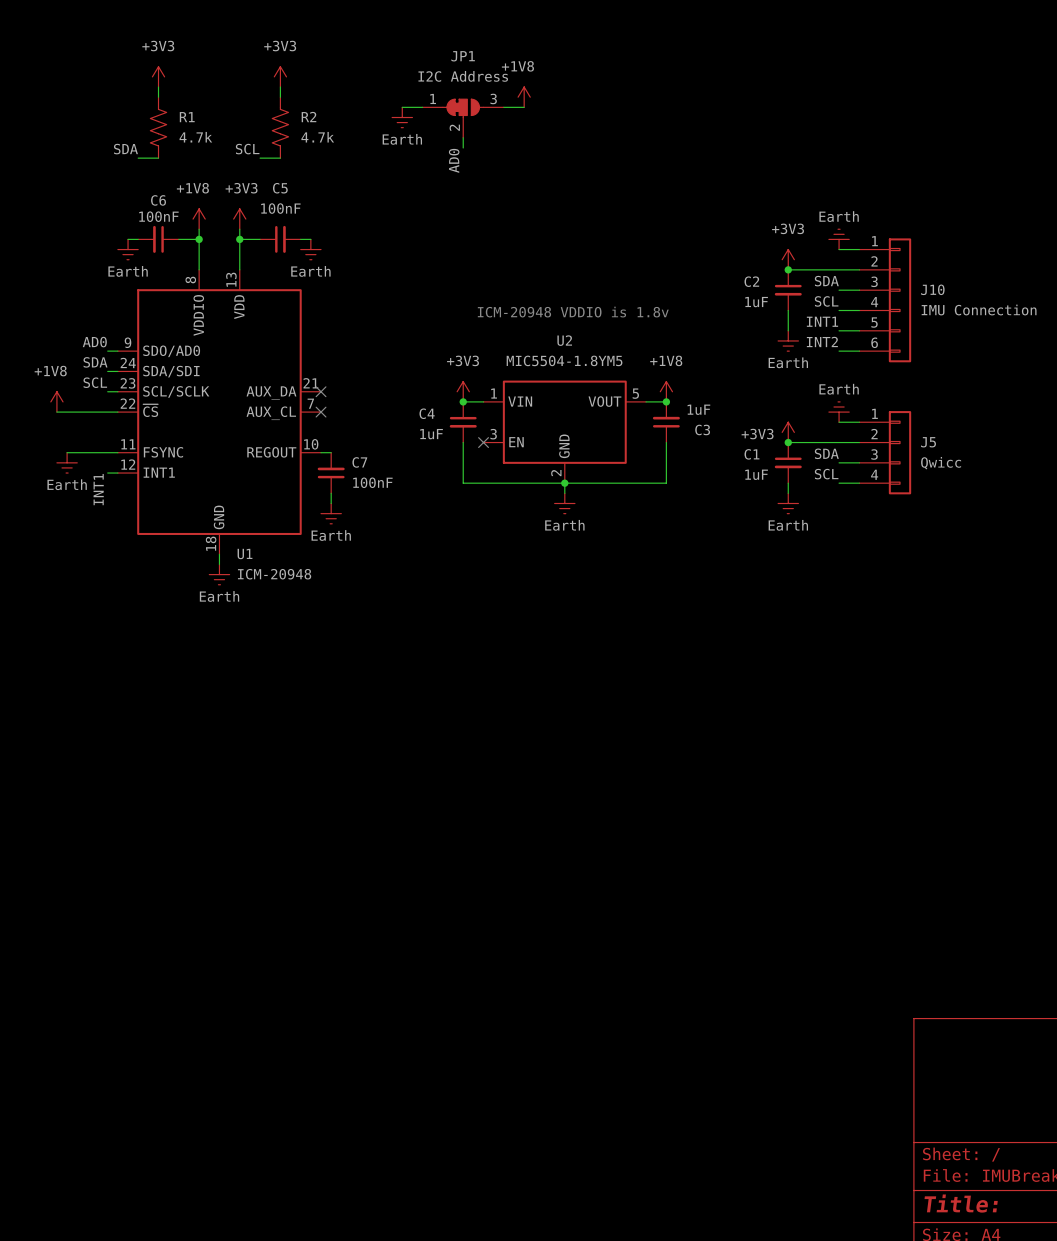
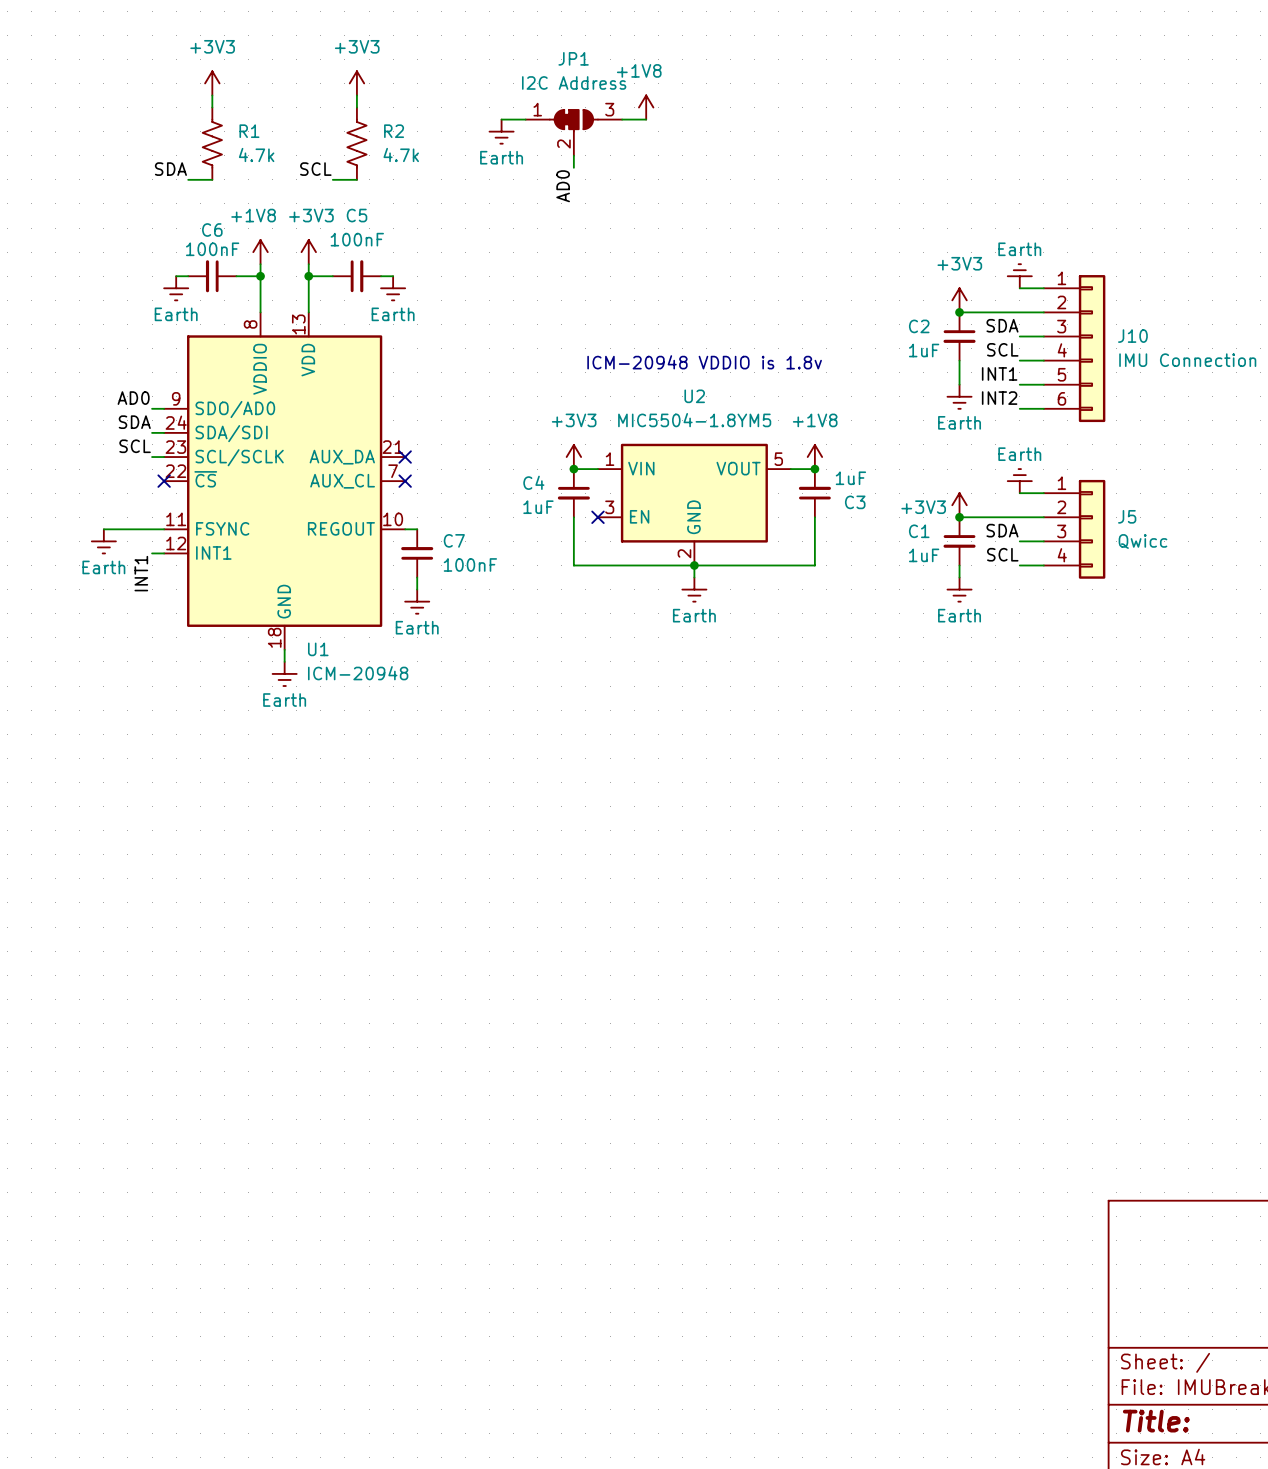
power symbol: +1V8 (56, 401) -> none
wire: (56, 412) (117, 412) -> none
no-connect mark: none -> (164, 481)

